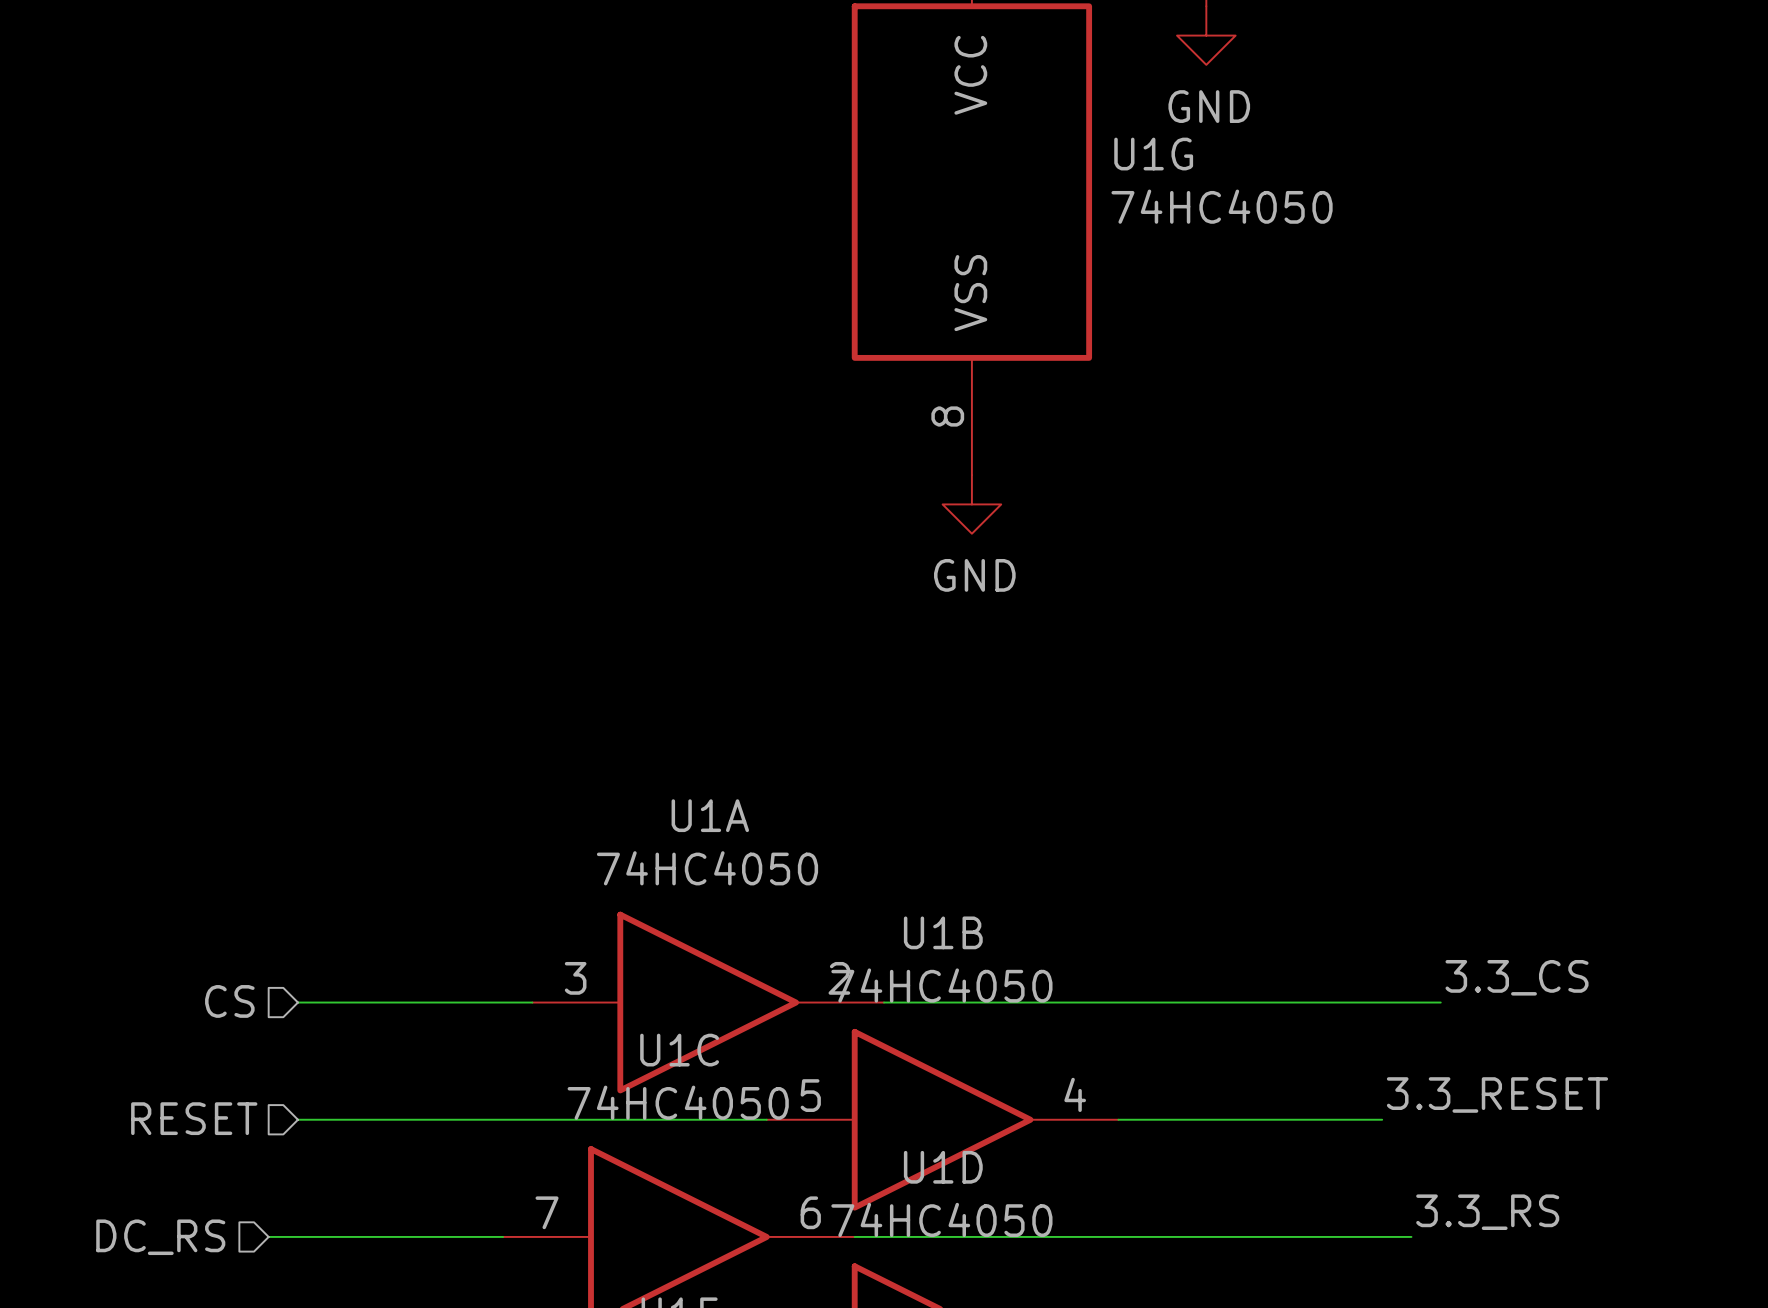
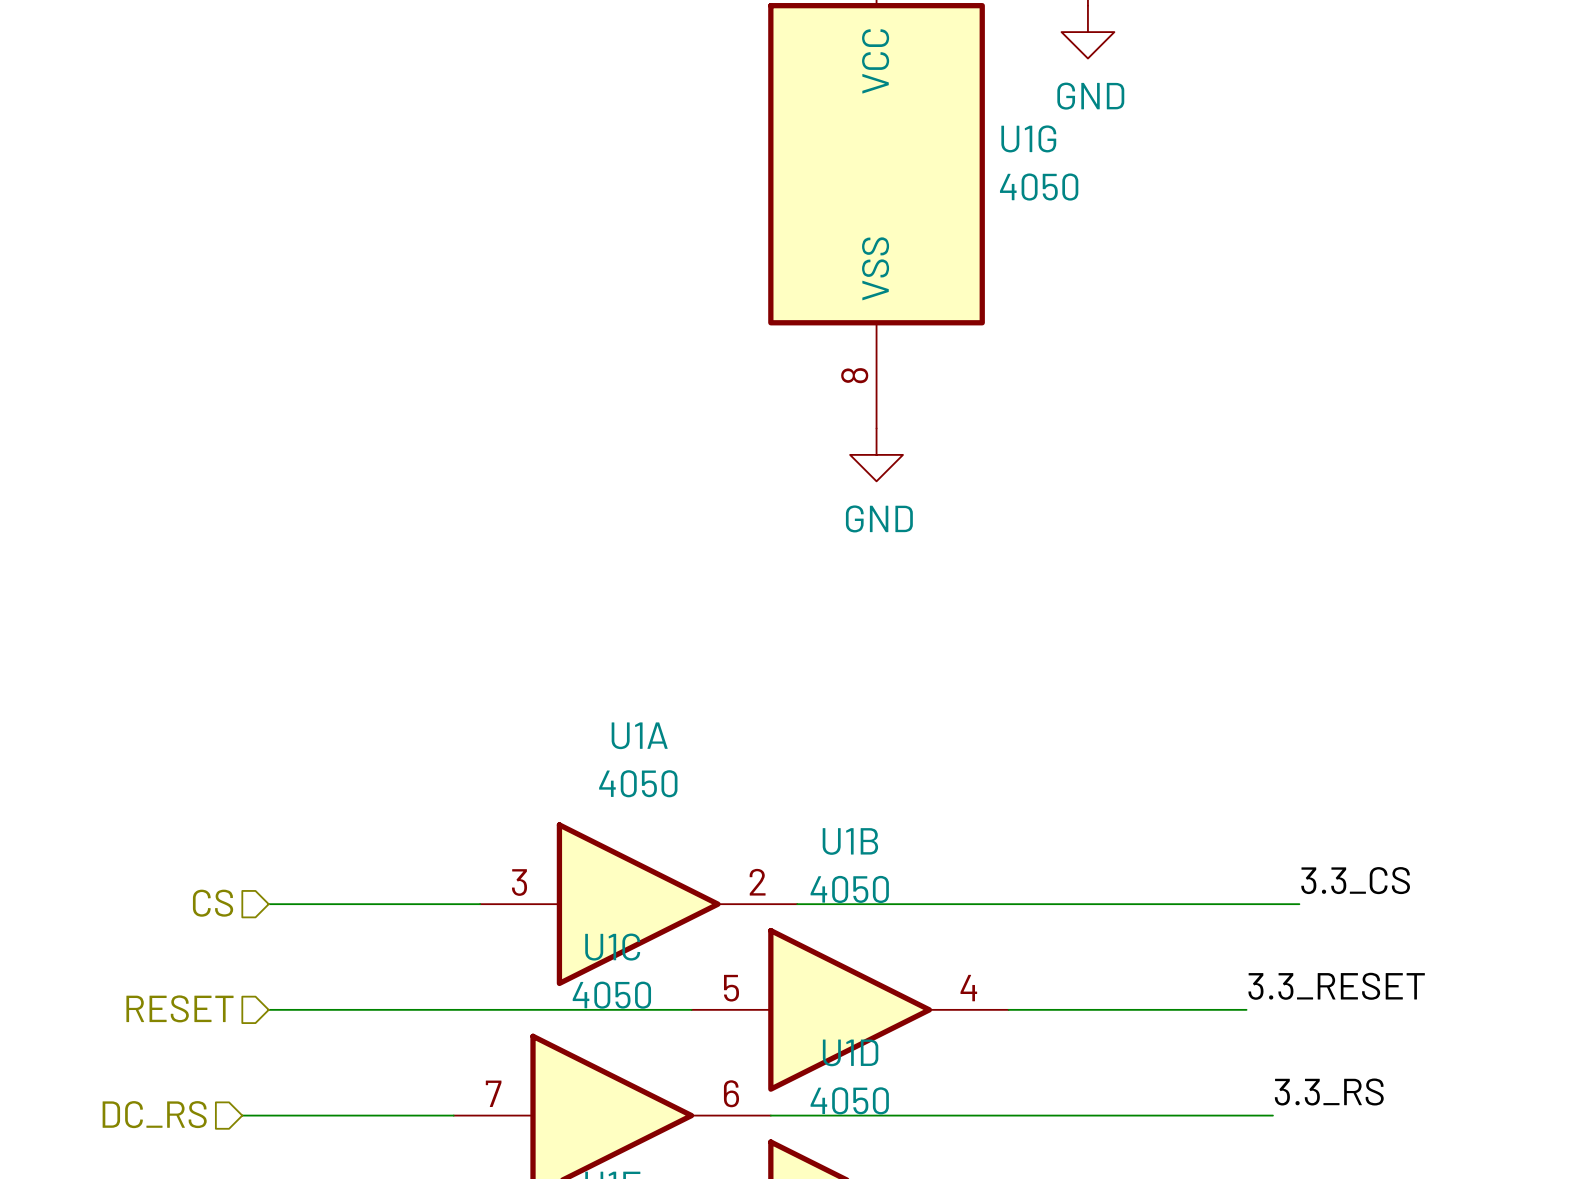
U1G value: 74HC4050 (1222, 206) -> 4050 (1039, 187)
U1A value: 74HC4050 (707, 868) -> 4050 (638, 783)
U1B value: 74HC4050 (941, 985) -> 4050 (849, 889)
U1C value: 74HC4050 (678, 1102) -> 4050 (611, 995)
U1D value: 74HC4050 (941, 1219) -> 4050 (849, 1100)

